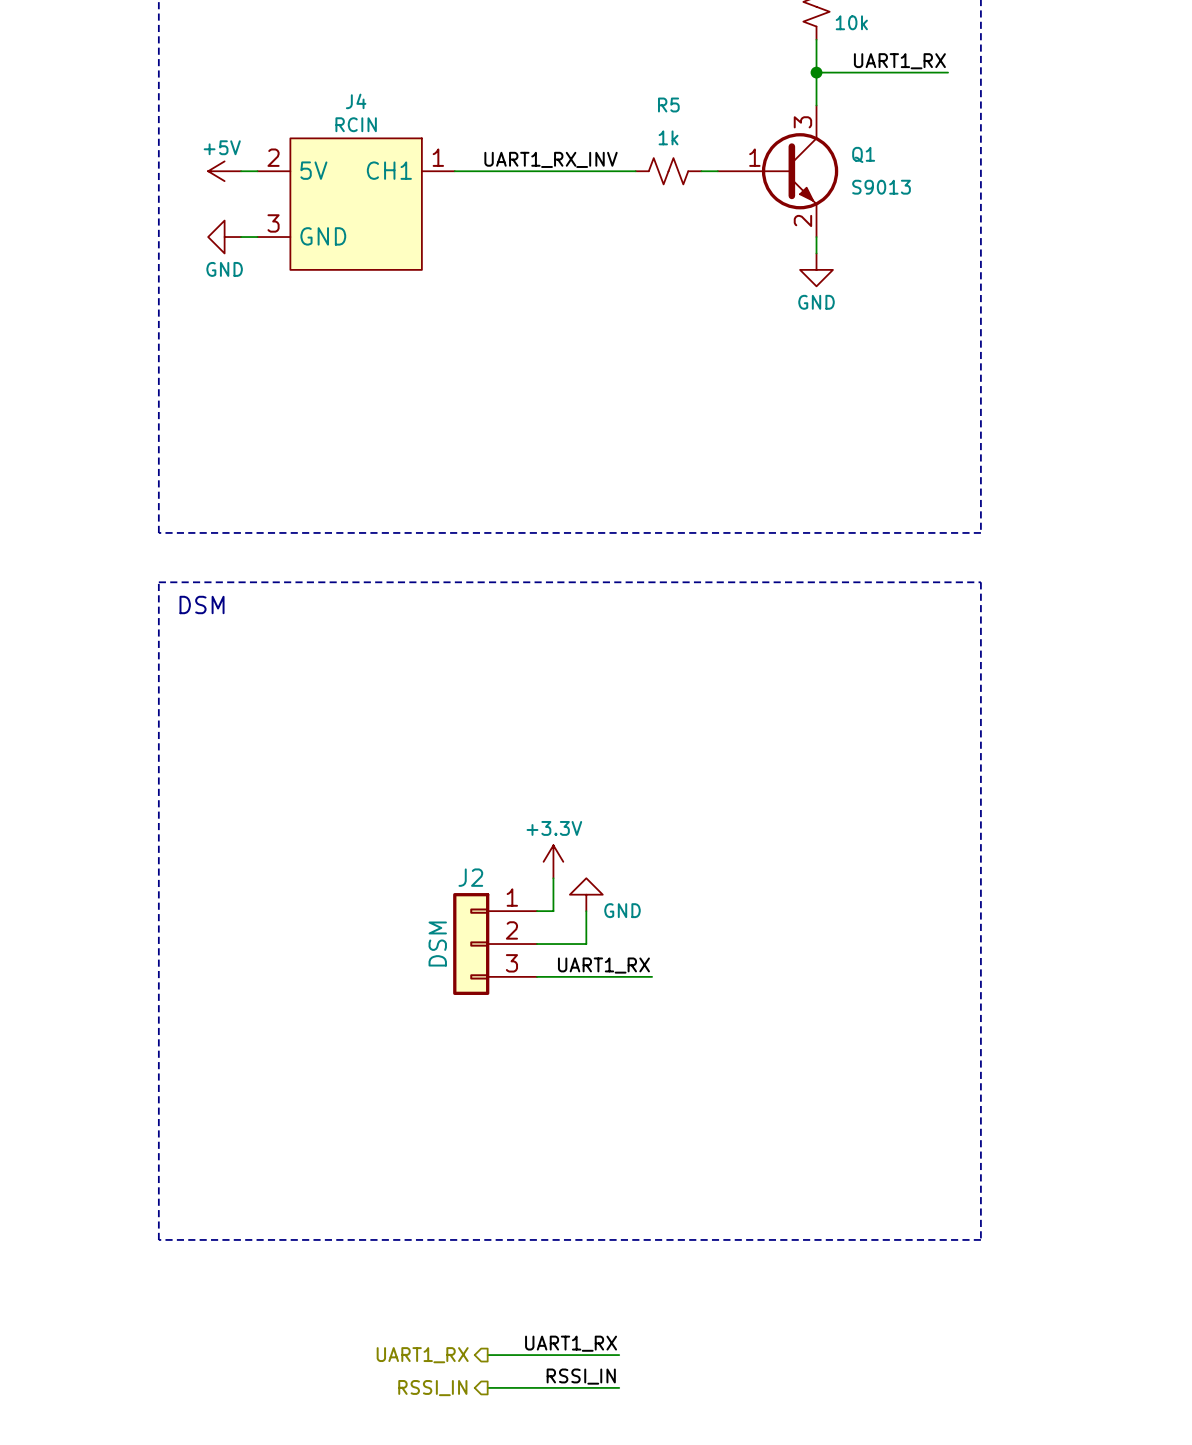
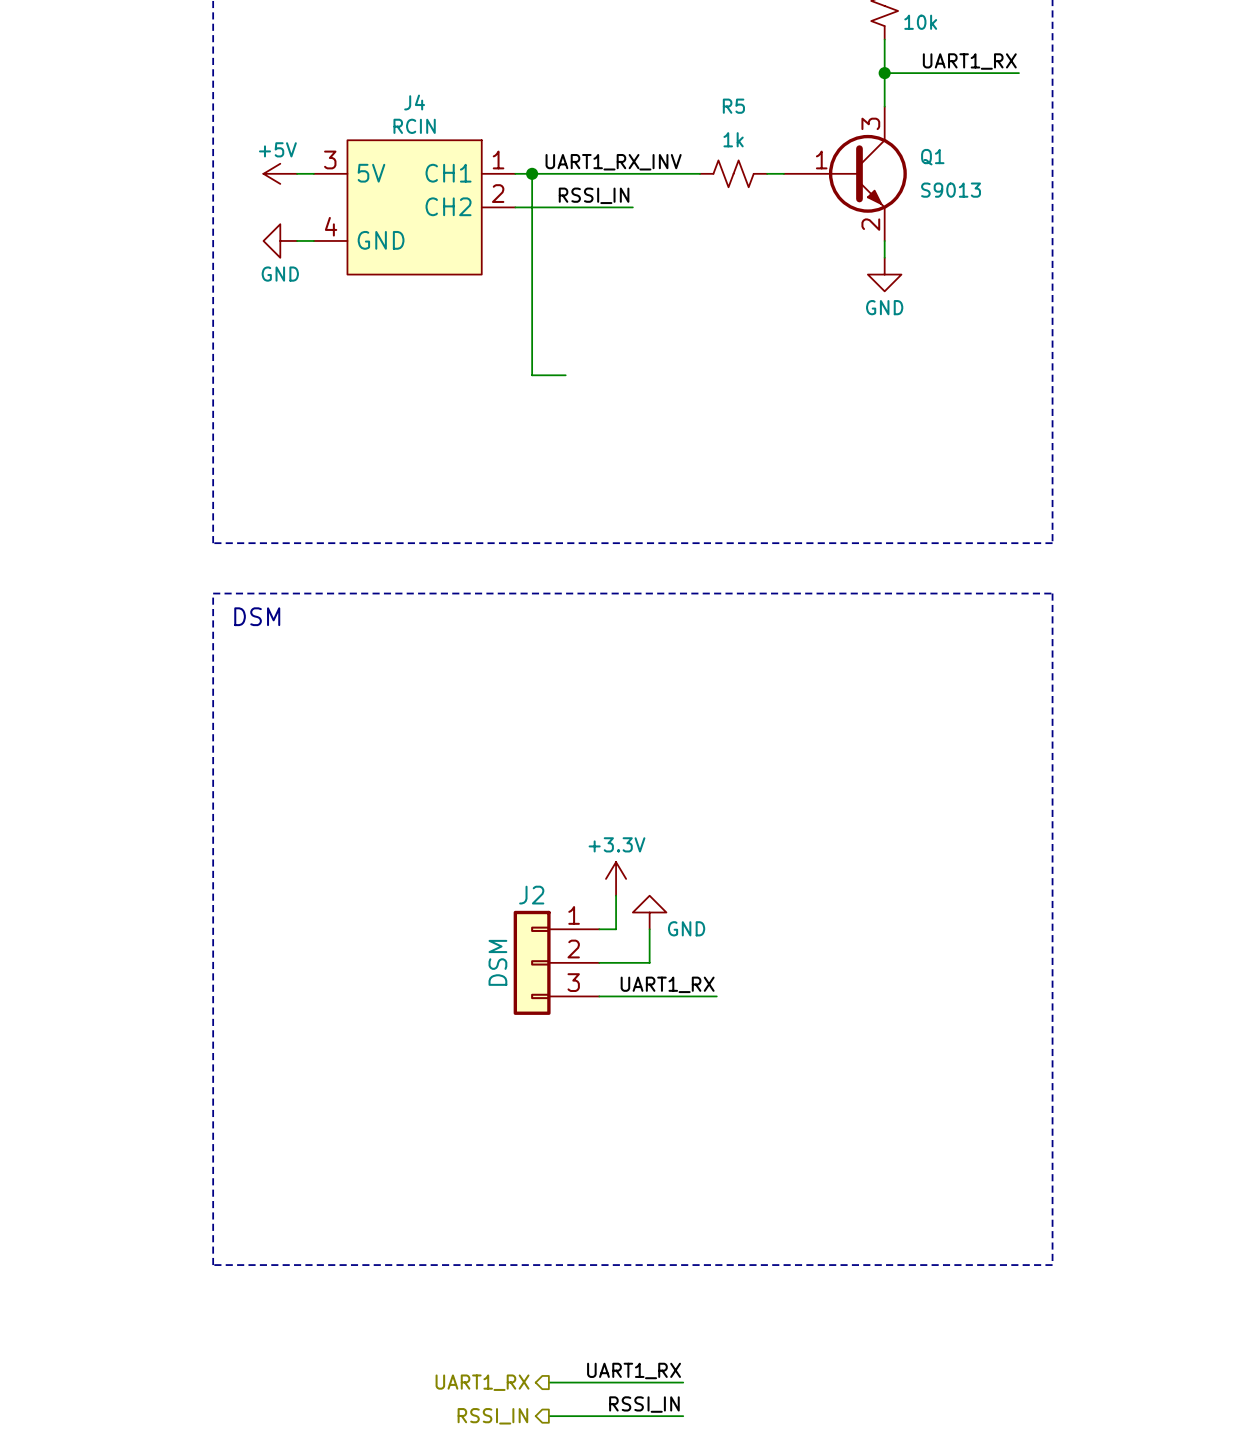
J4 symbol: [257, 138, 455, 270] -> [313, 140, 516, 275]
wire: none -> (532, 173) (532, 375) (565, 375)
junction: none -> (532, 173)
label: none -> RSSI_IN (594, 195)
wire: none -> (515, 207) (632, 207)

